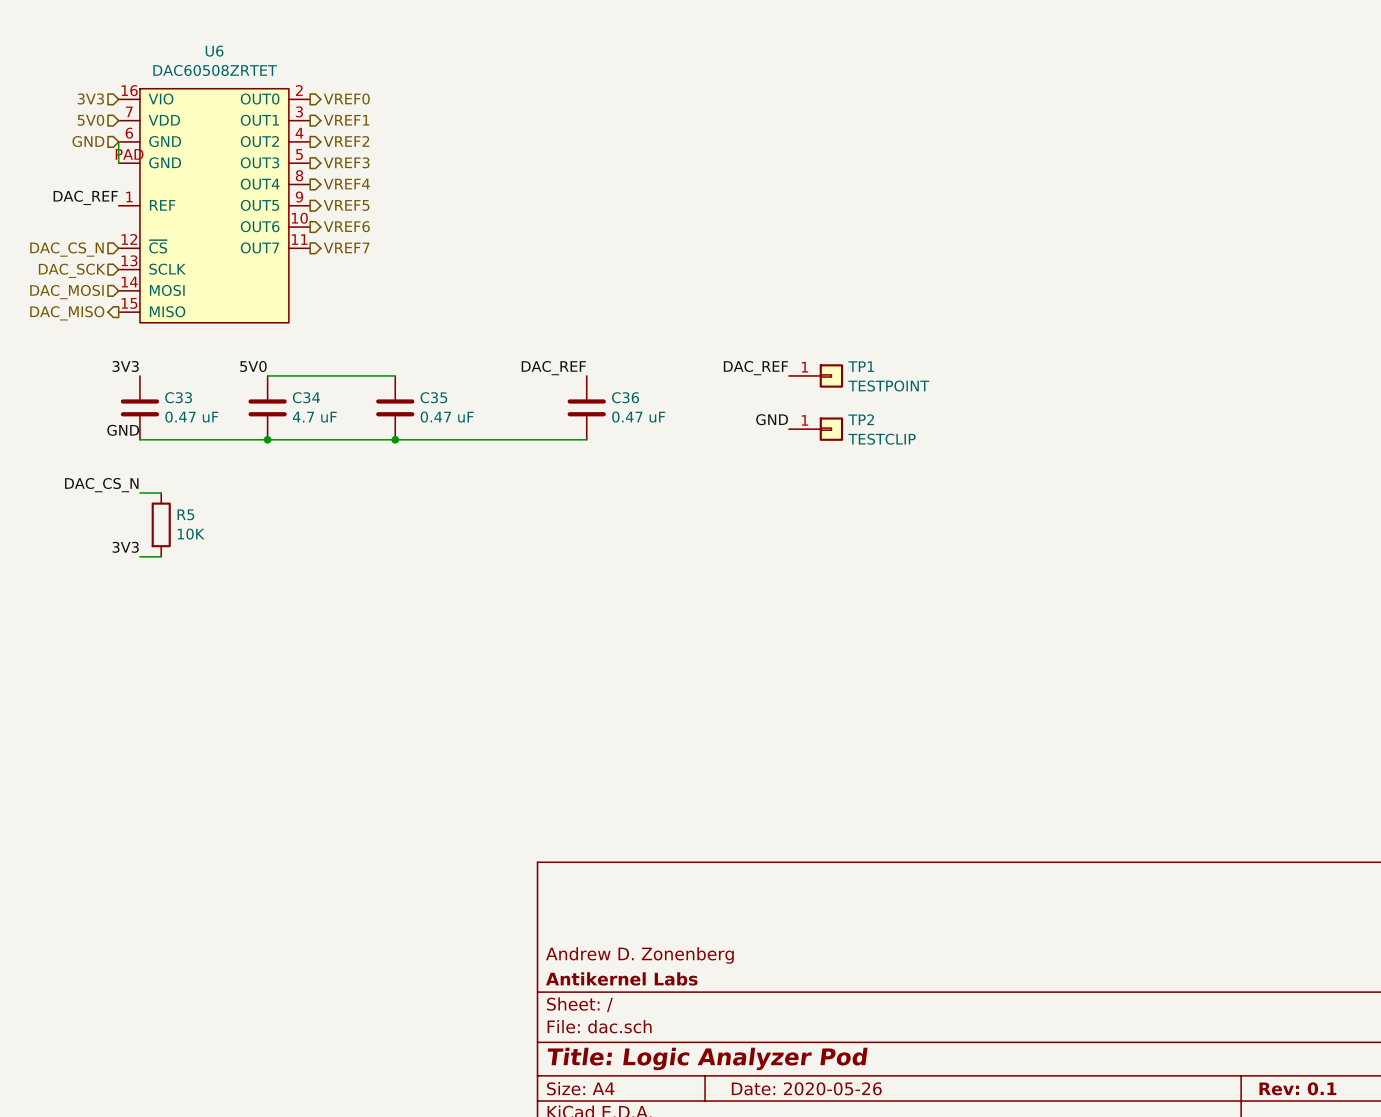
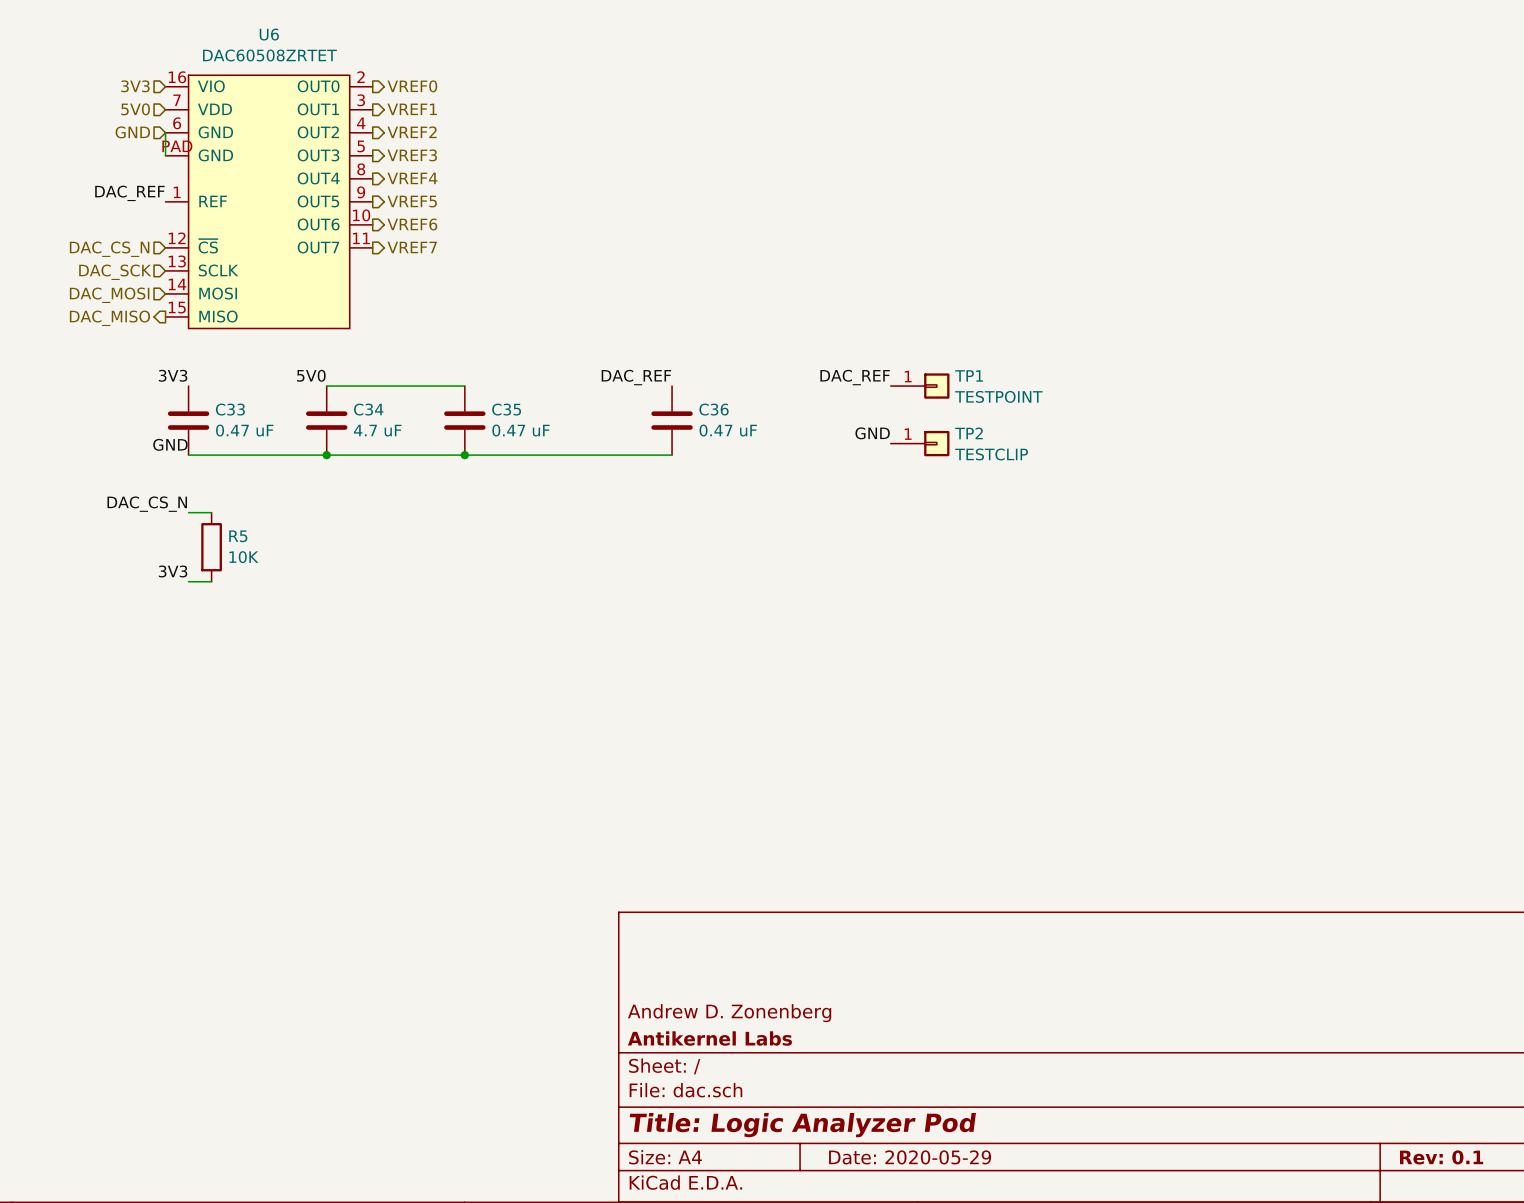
title block: Date: 2020-05-26 (806, 1088) -> Date: 2020-05-29 (910, 1157)

